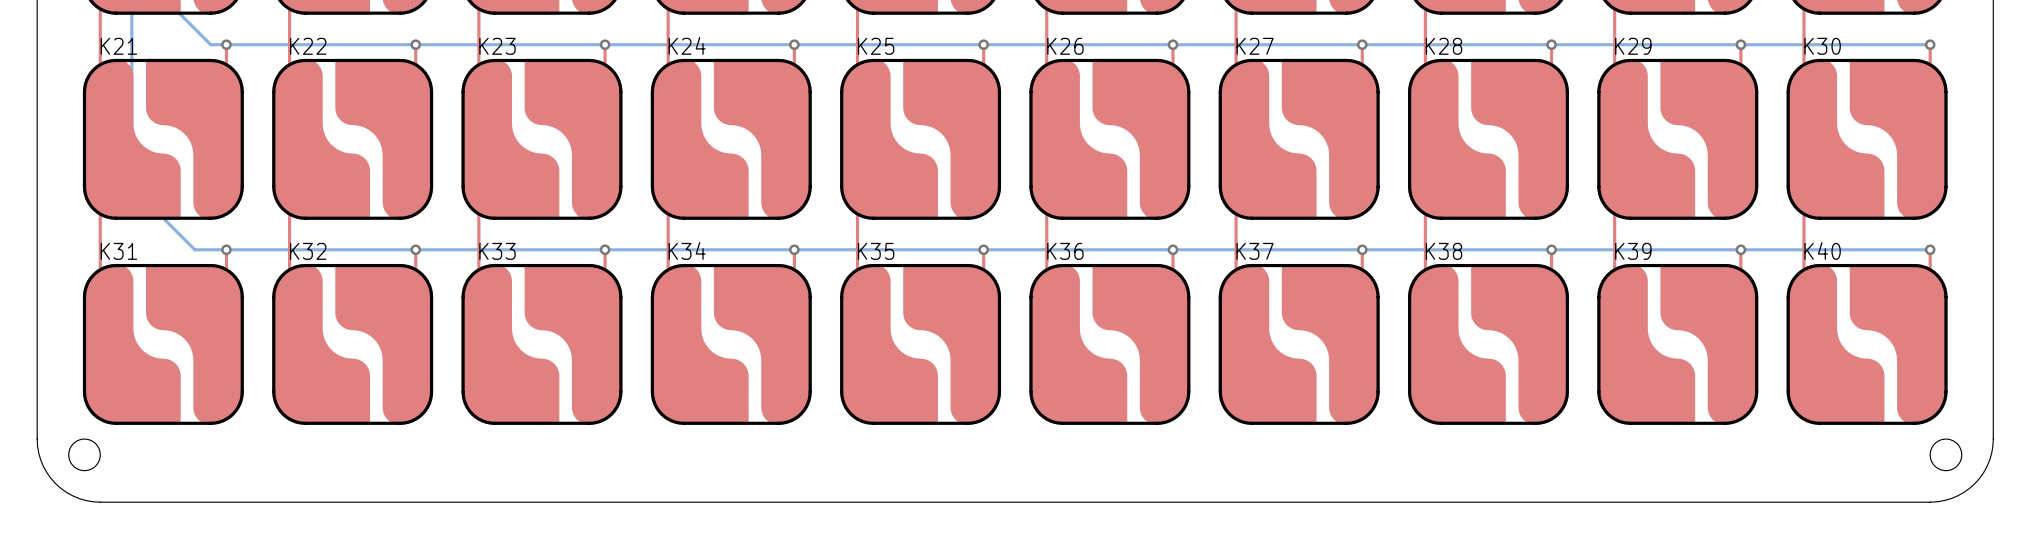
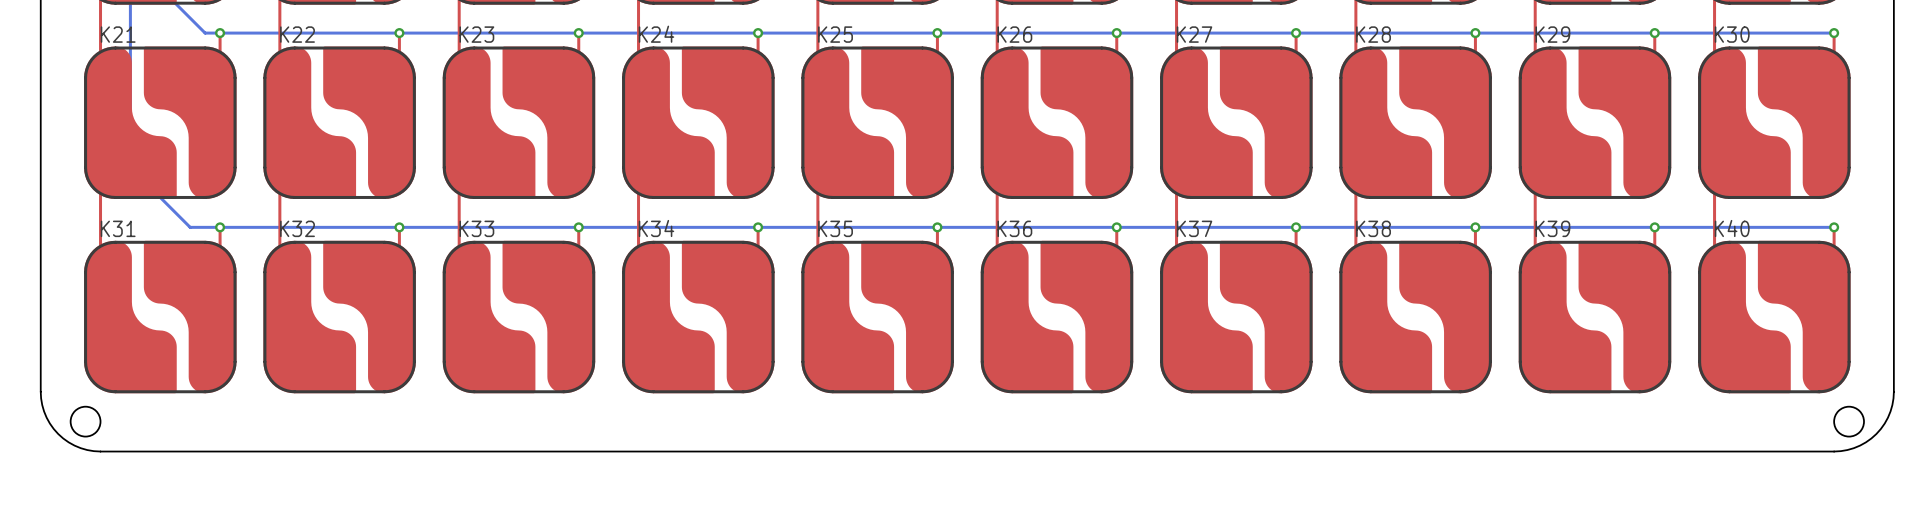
board edge: (37, 423) (38, 453) (43, 466) (50, 478) (60, 488) (72, 495) (86, 500) (100, 502) (1930, 502) (1944, 500) (1957, 495) (1969, 488) (1979, 478) (1987, 466) (1991, 453) (1993, 423) -> (40, 391) (46, 417) (58, 434) (74, 445) (100, 451) (1834, 451) (1860, 445) (1876, 434) (1887, 417) (1893, 391)

